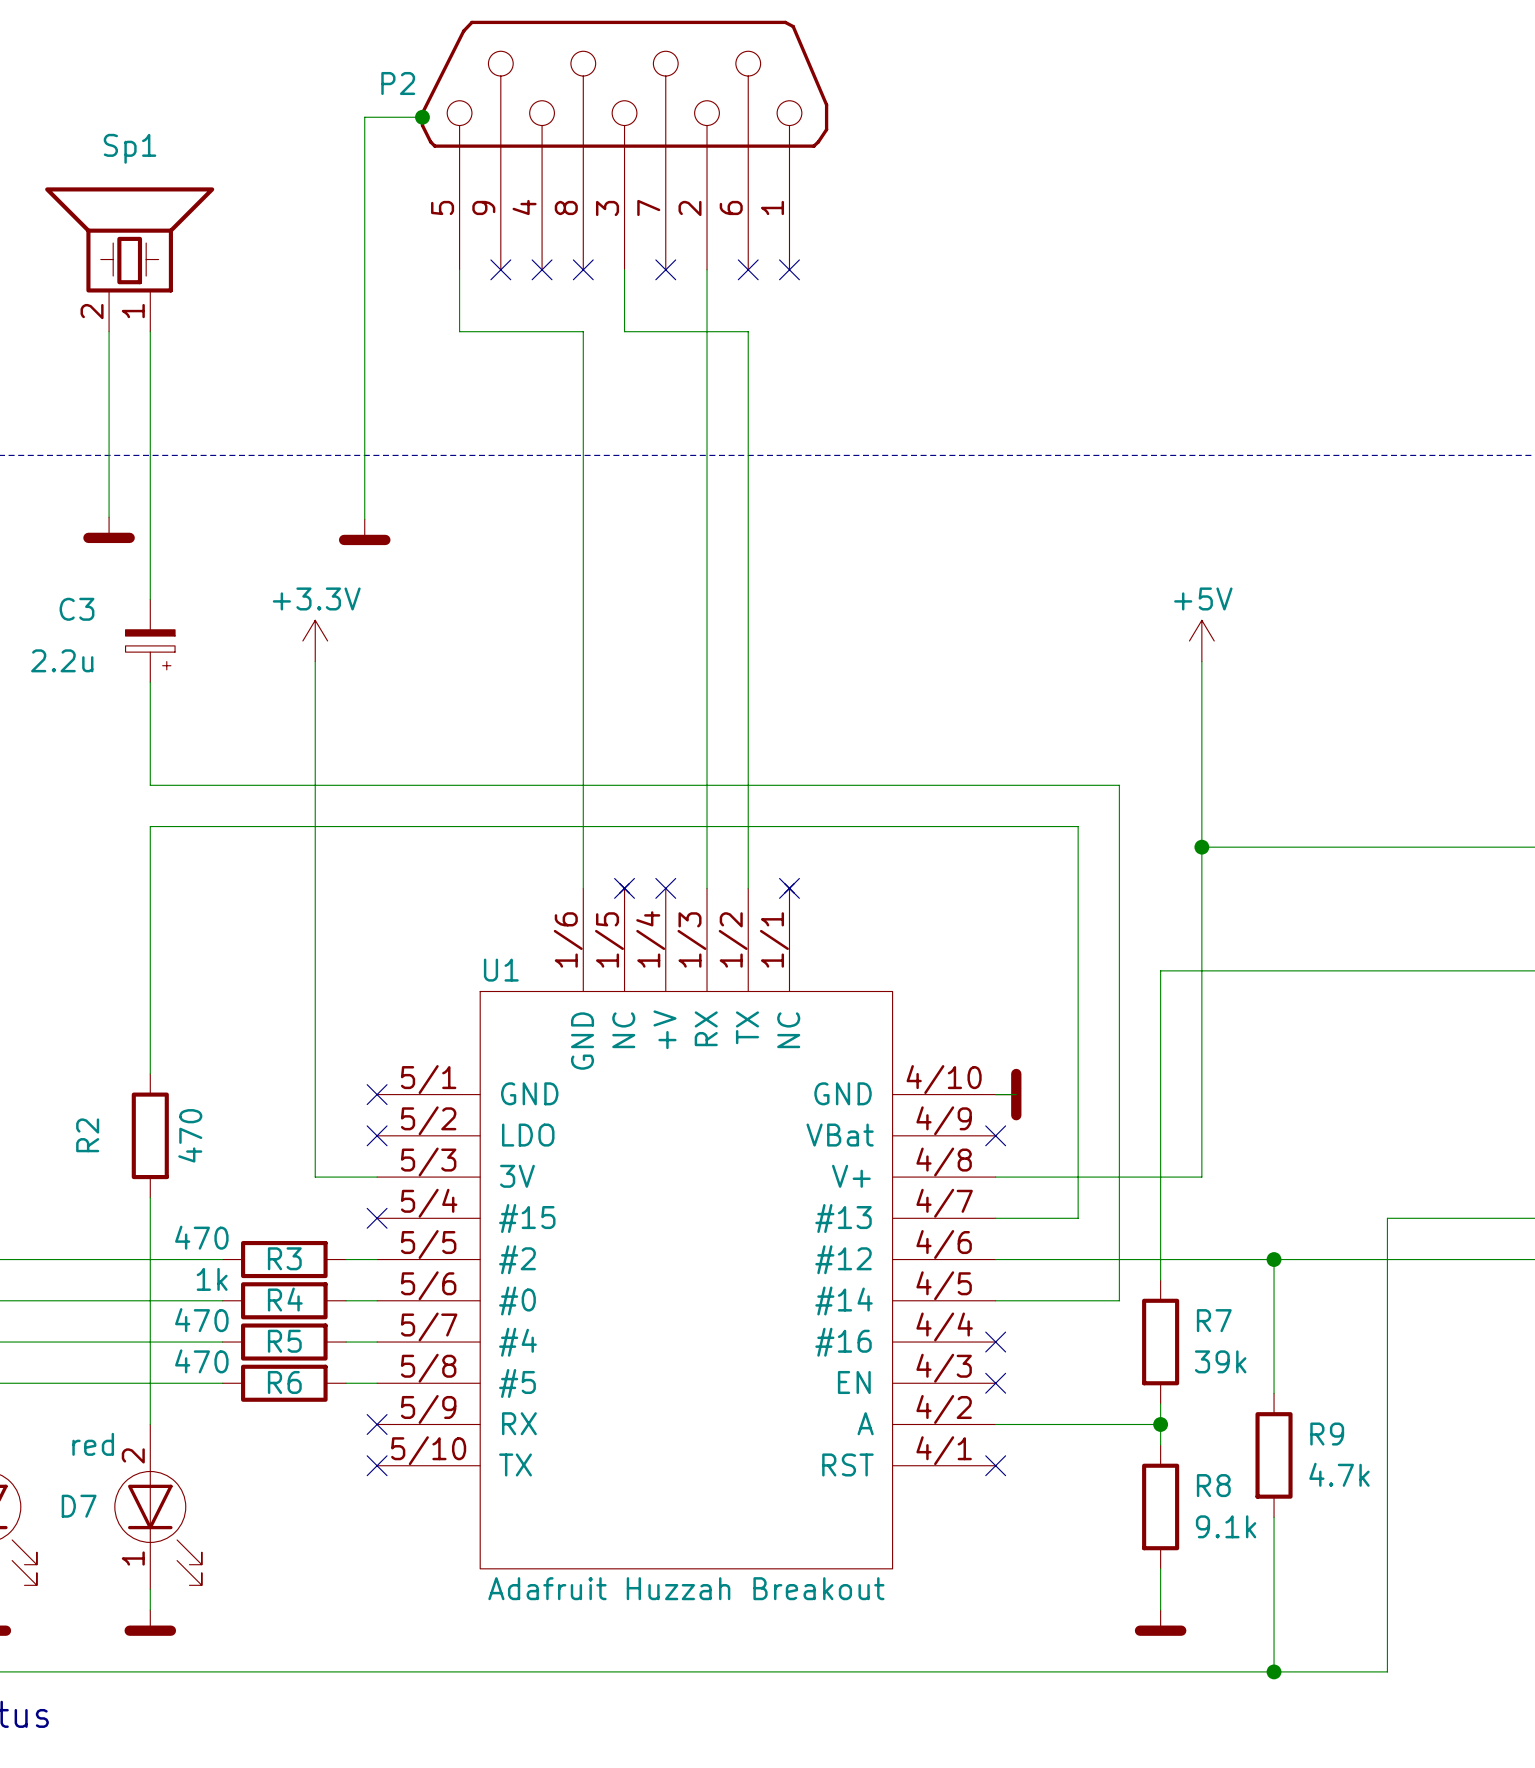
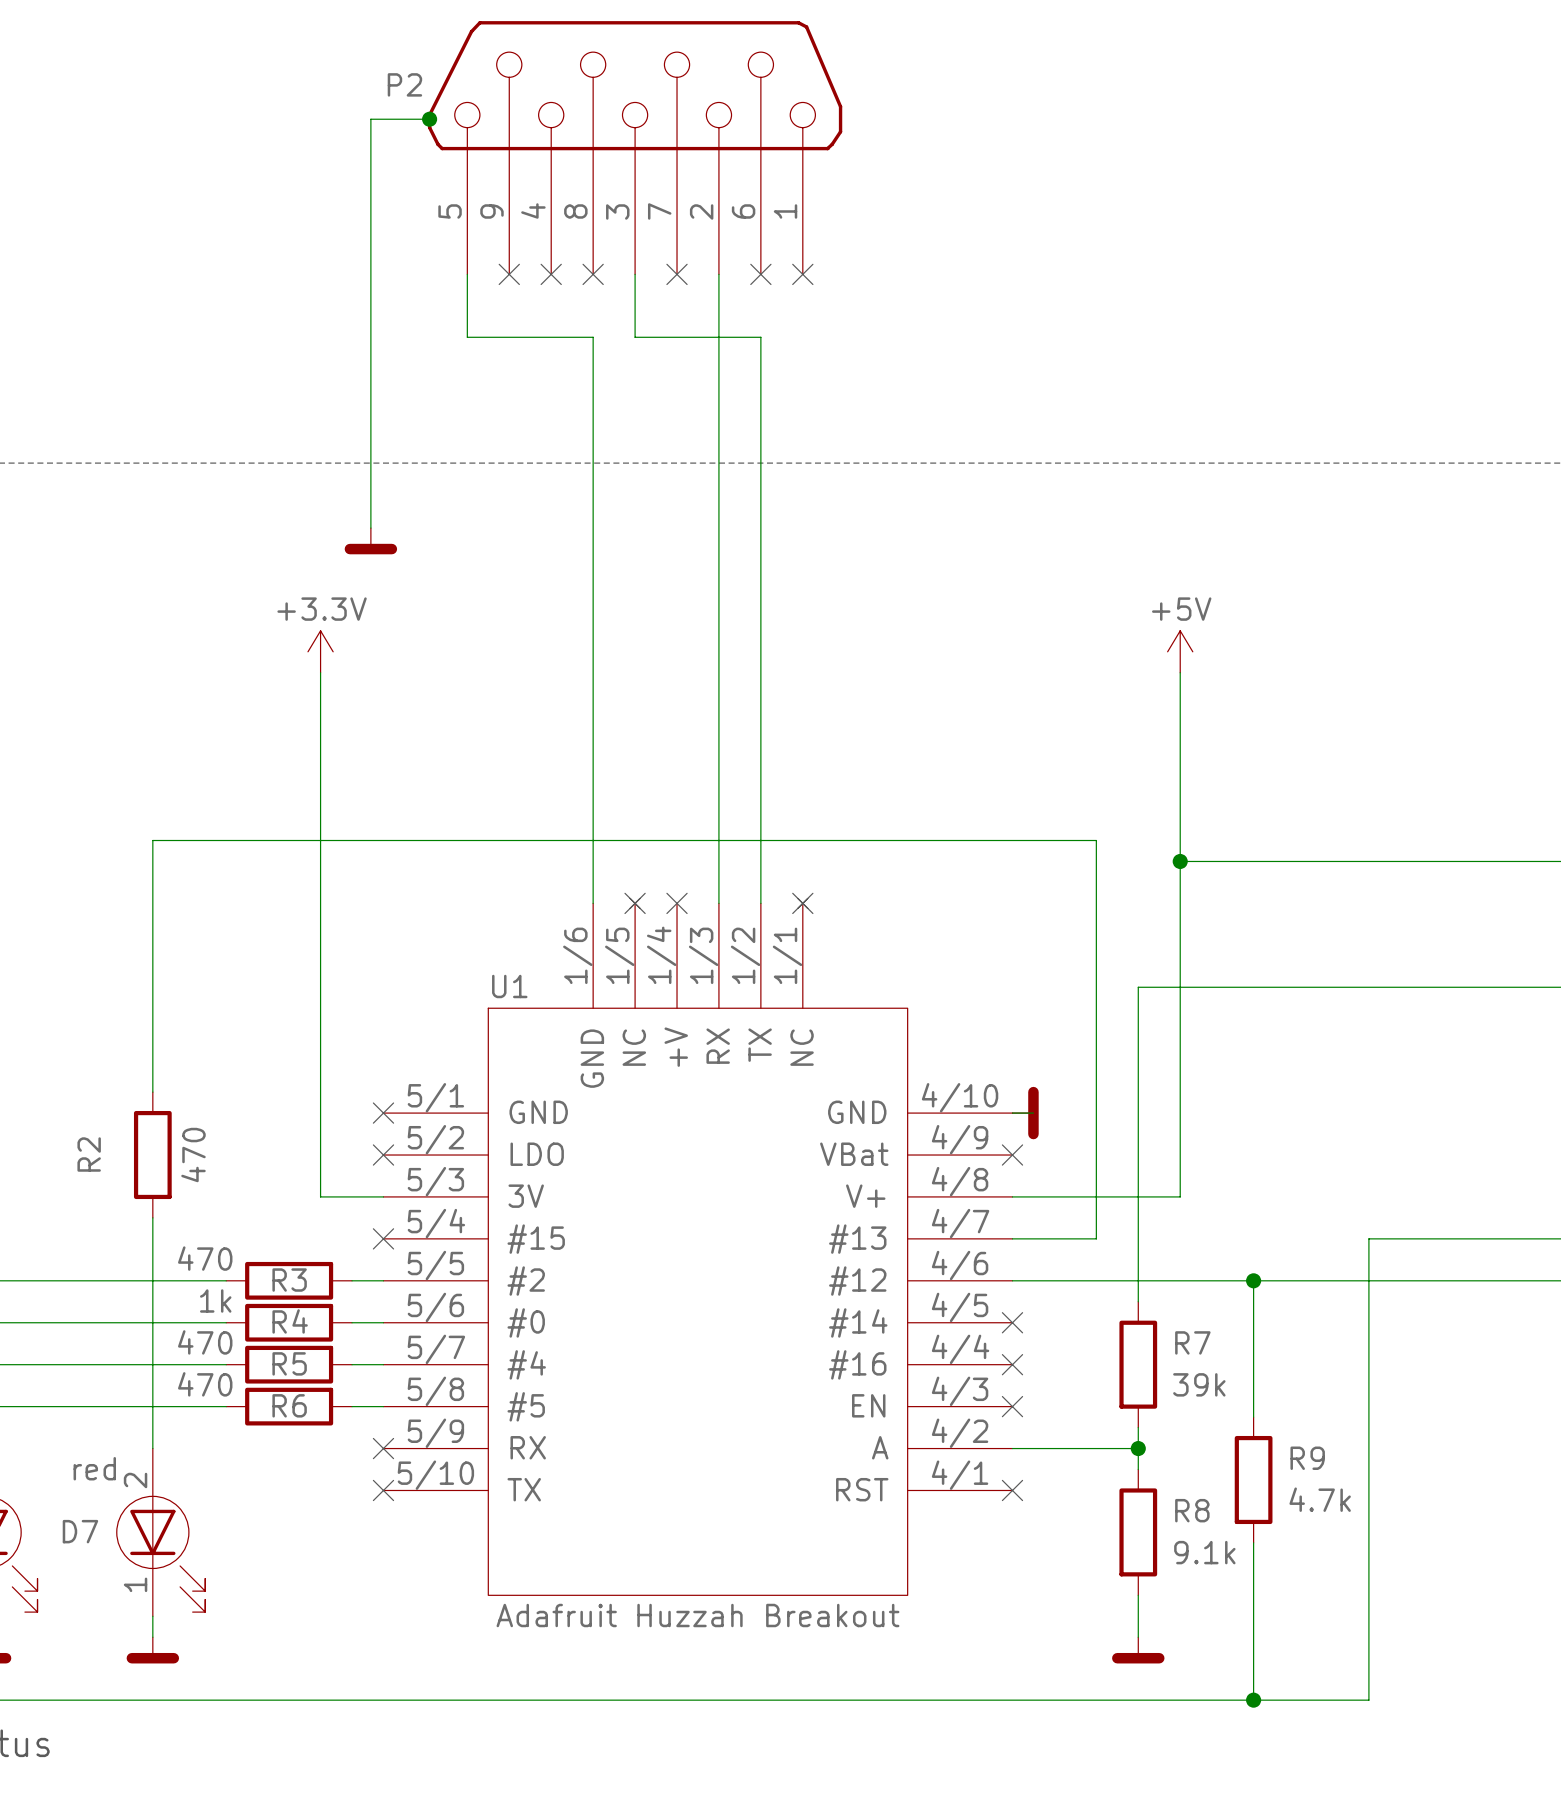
Sp1: (129, 259) -> none
wire: (109, 331) (109, 517) -> none
wire: (150, 331) (150, 599) -> none
power symbol: (109, 530) -> none
C3: 2.2u (150, 640) -> none
power symbol position: +5V (1201, 640) -> +5V (1180, 651)
wire: (1201, 661) (1201, 1177) (1160, 1177) (1160, 1280) -> none
wire: (150, 682) (150, 785) (1119, 785) (1119, 970) -> (1180, 672) (1180, 987) (1138, 987)
wire: none -> (1180, 861) (1222, 861)
junction position: (1201, 847) -> (1180, 861)
wire: (1387, 1218) (1387, 1671) (1346, 1671) -> (1410, 1238) (1368, 1238) (1368, 1700)
wire: (1274, 1259) (1274, 1393) -> (1253, 1280) (1253, 1417)
junction position: (1274, 1259) -> (1253, 1280)
wire: (1119, 1280) (1119, 1300) (995, 1300) -> none
no-connect mark: none -> (1012, 1322)
R7 position: (1160, 1342) -> (1138, 1364)
wire: (1160, 1403) (1160, 1445) -> (1138, 1427) (1138, 1469)
wire: (1119, 1424) (1160, 1424) -> none
junction position: (1160, 1424) -> (1138, 1448)
R9 position: (1274, 1455) -> (1253, 1480)
R8 position: (1160, 1506) -> (1138, 1532)
wire: (1274, 1517) (1274, 1671) -> (1253, 1542) (1253, 1700)
wire: (1160, 1568) (1160, 1610) -> (1138, 1595) (1138, 1637)
power symbol position: (1160, 1622) -> (1138, 1650)
junction position: (1274, 1671) -> (1253, 1700)

